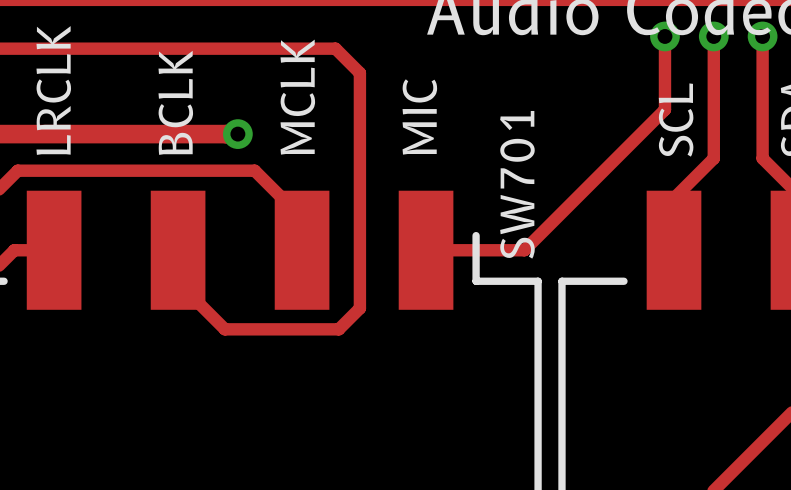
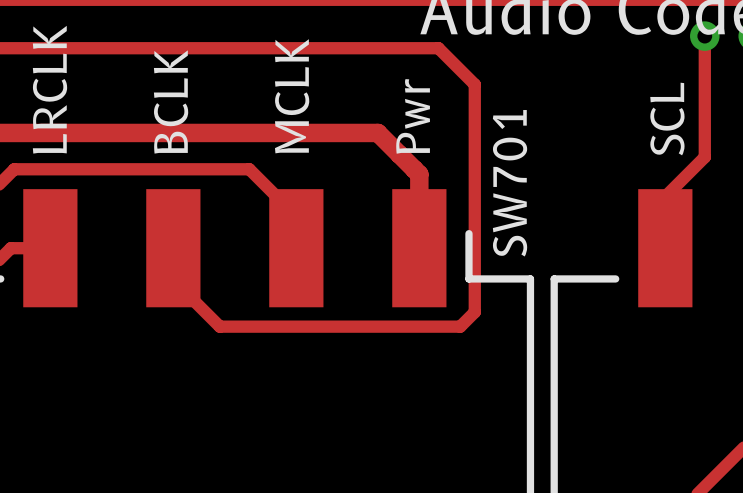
track: (664, 36) (664, 109) (524, 250) (426, 250) -> (232, 132) (377, 132) (419, 174) (419, 248)
via: (664, 36) -> none
track: (335, 48) (359, 73) (359, 308) (338, 329) -> (329, 48) (438, 48) (474, 84) (474, 312) (460, 326) (332, 326)
text: MIC (419, 116) -> Pwr (413, 116)
via: (237, 134) -> none

